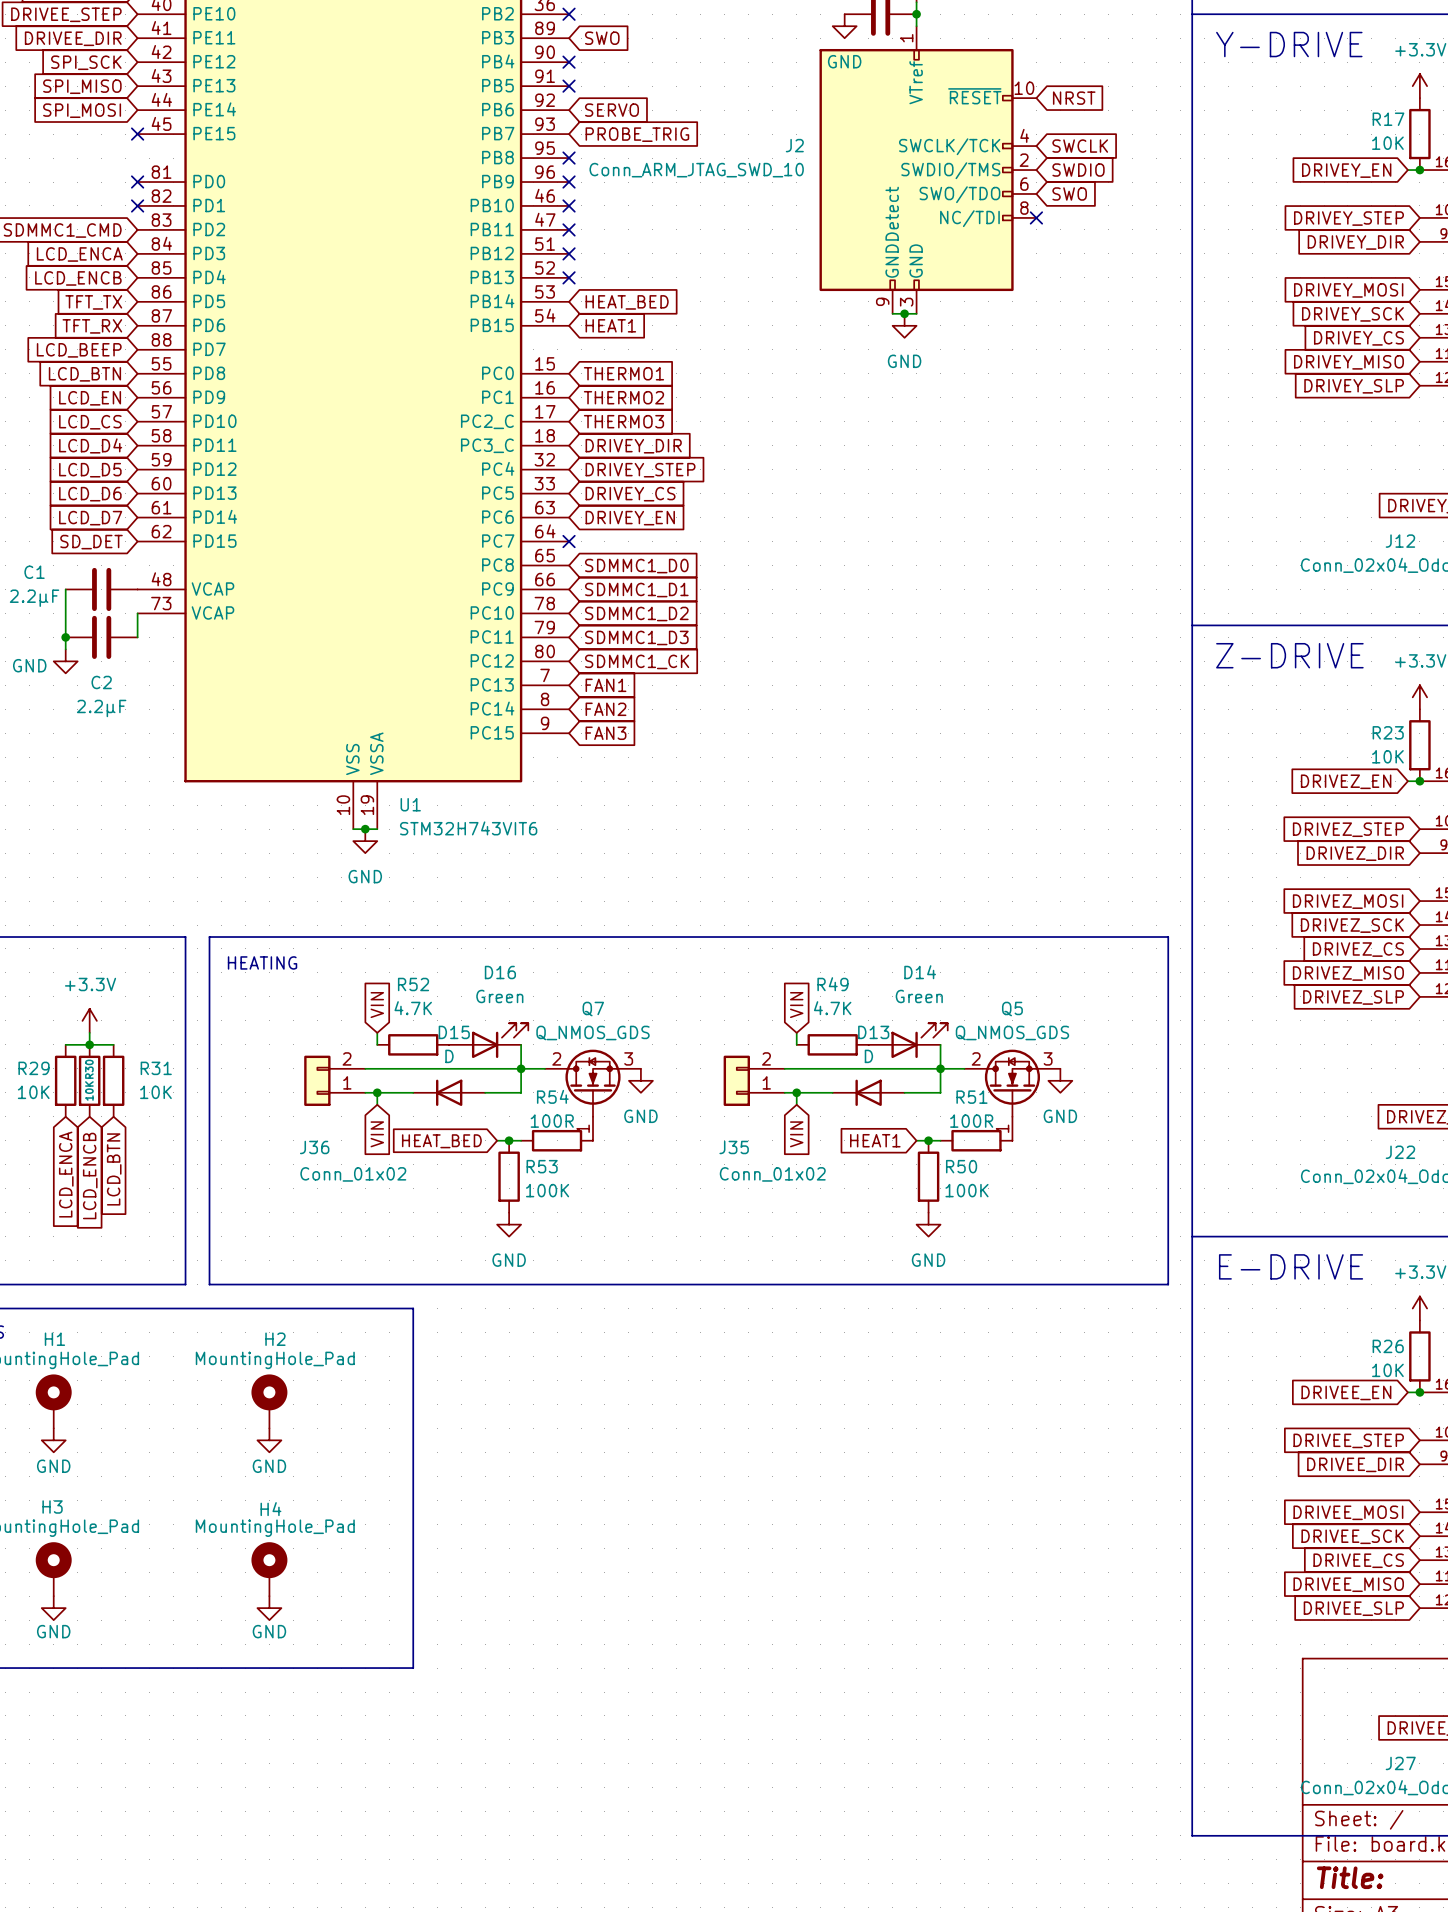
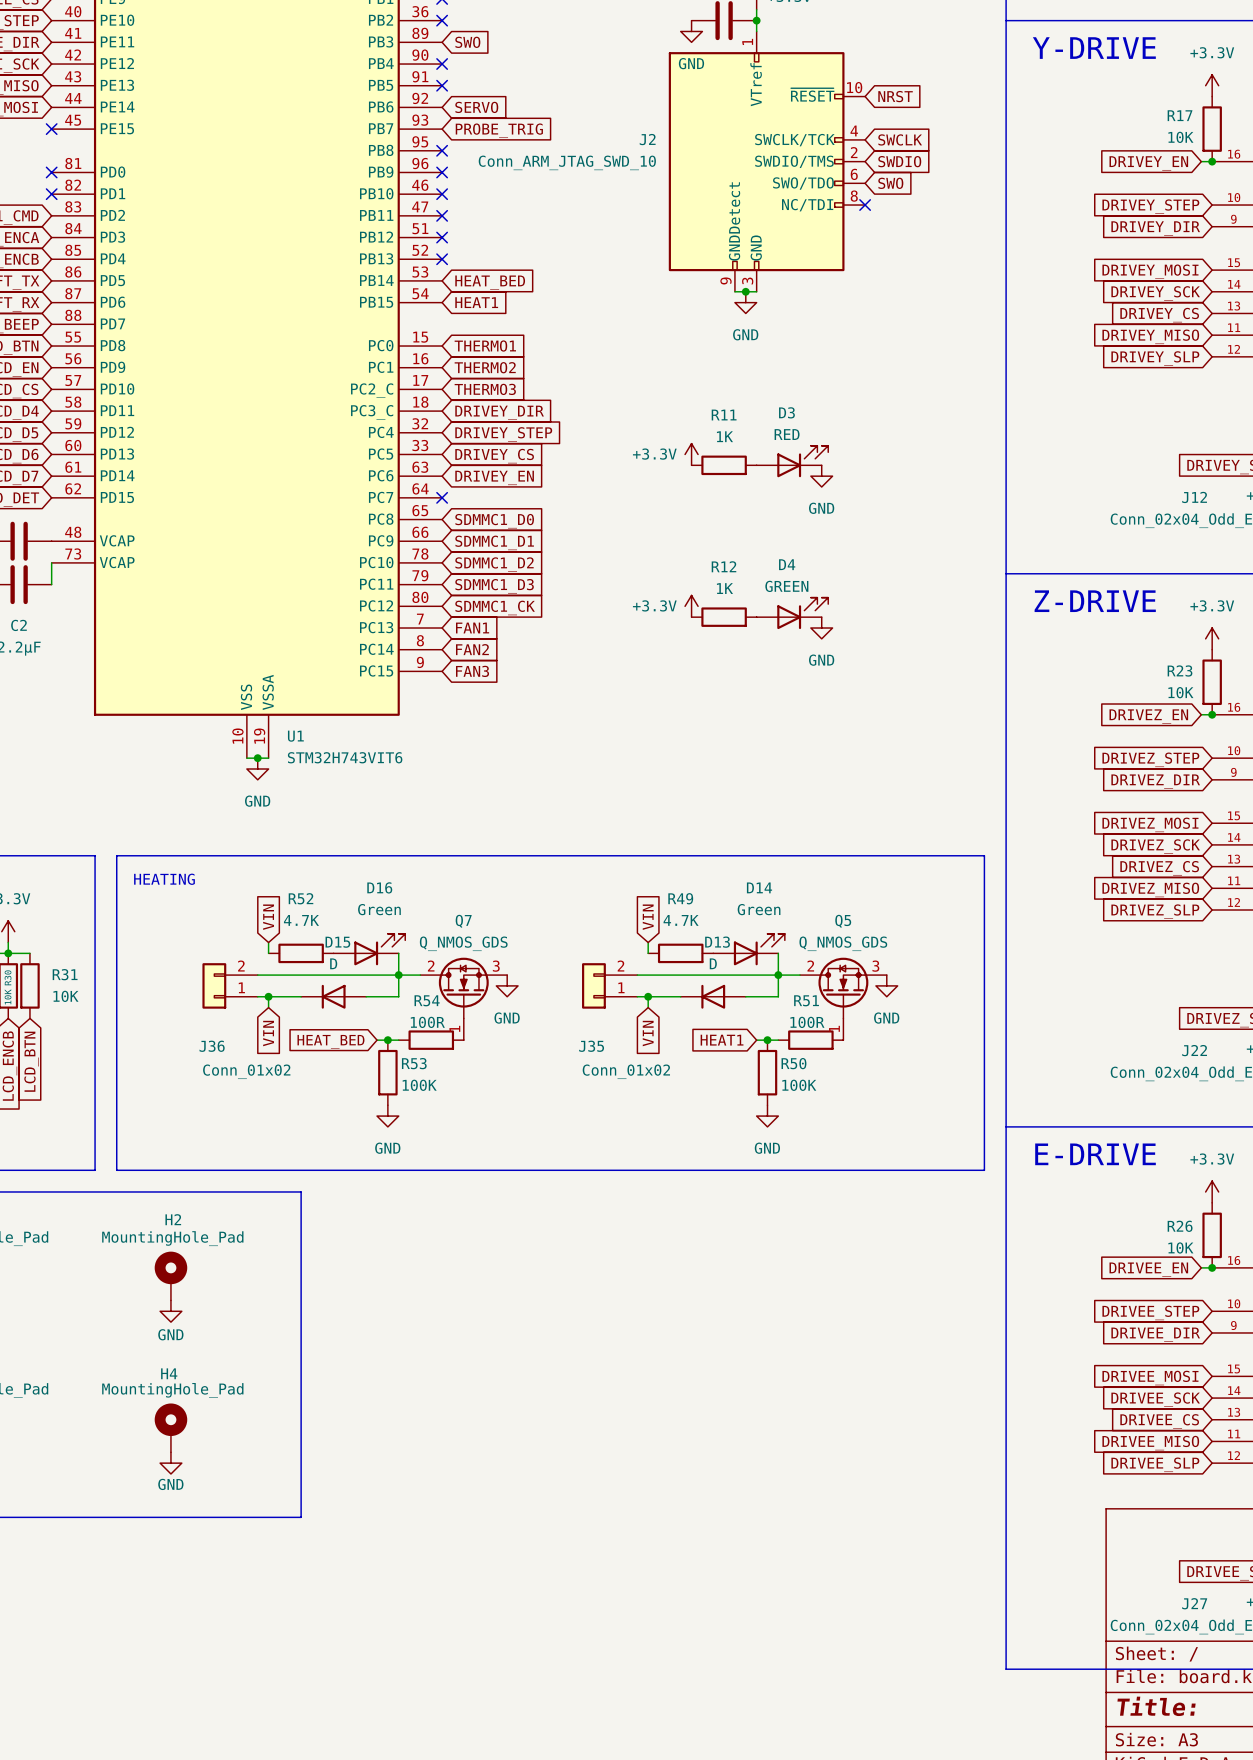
power symbol: none -> +3.3V (691, 454)
D3: none -> RED (792, 461)
R11: none -> 1K (724, 465)
power symbol: none -> GND (821, 476)
power symbol: none -> +3.3V (691, 606)
D4: none -> GREEN (792, 613)
R12: none -> 1K (724, 617)
power symbol: none -> GND (821, 628)

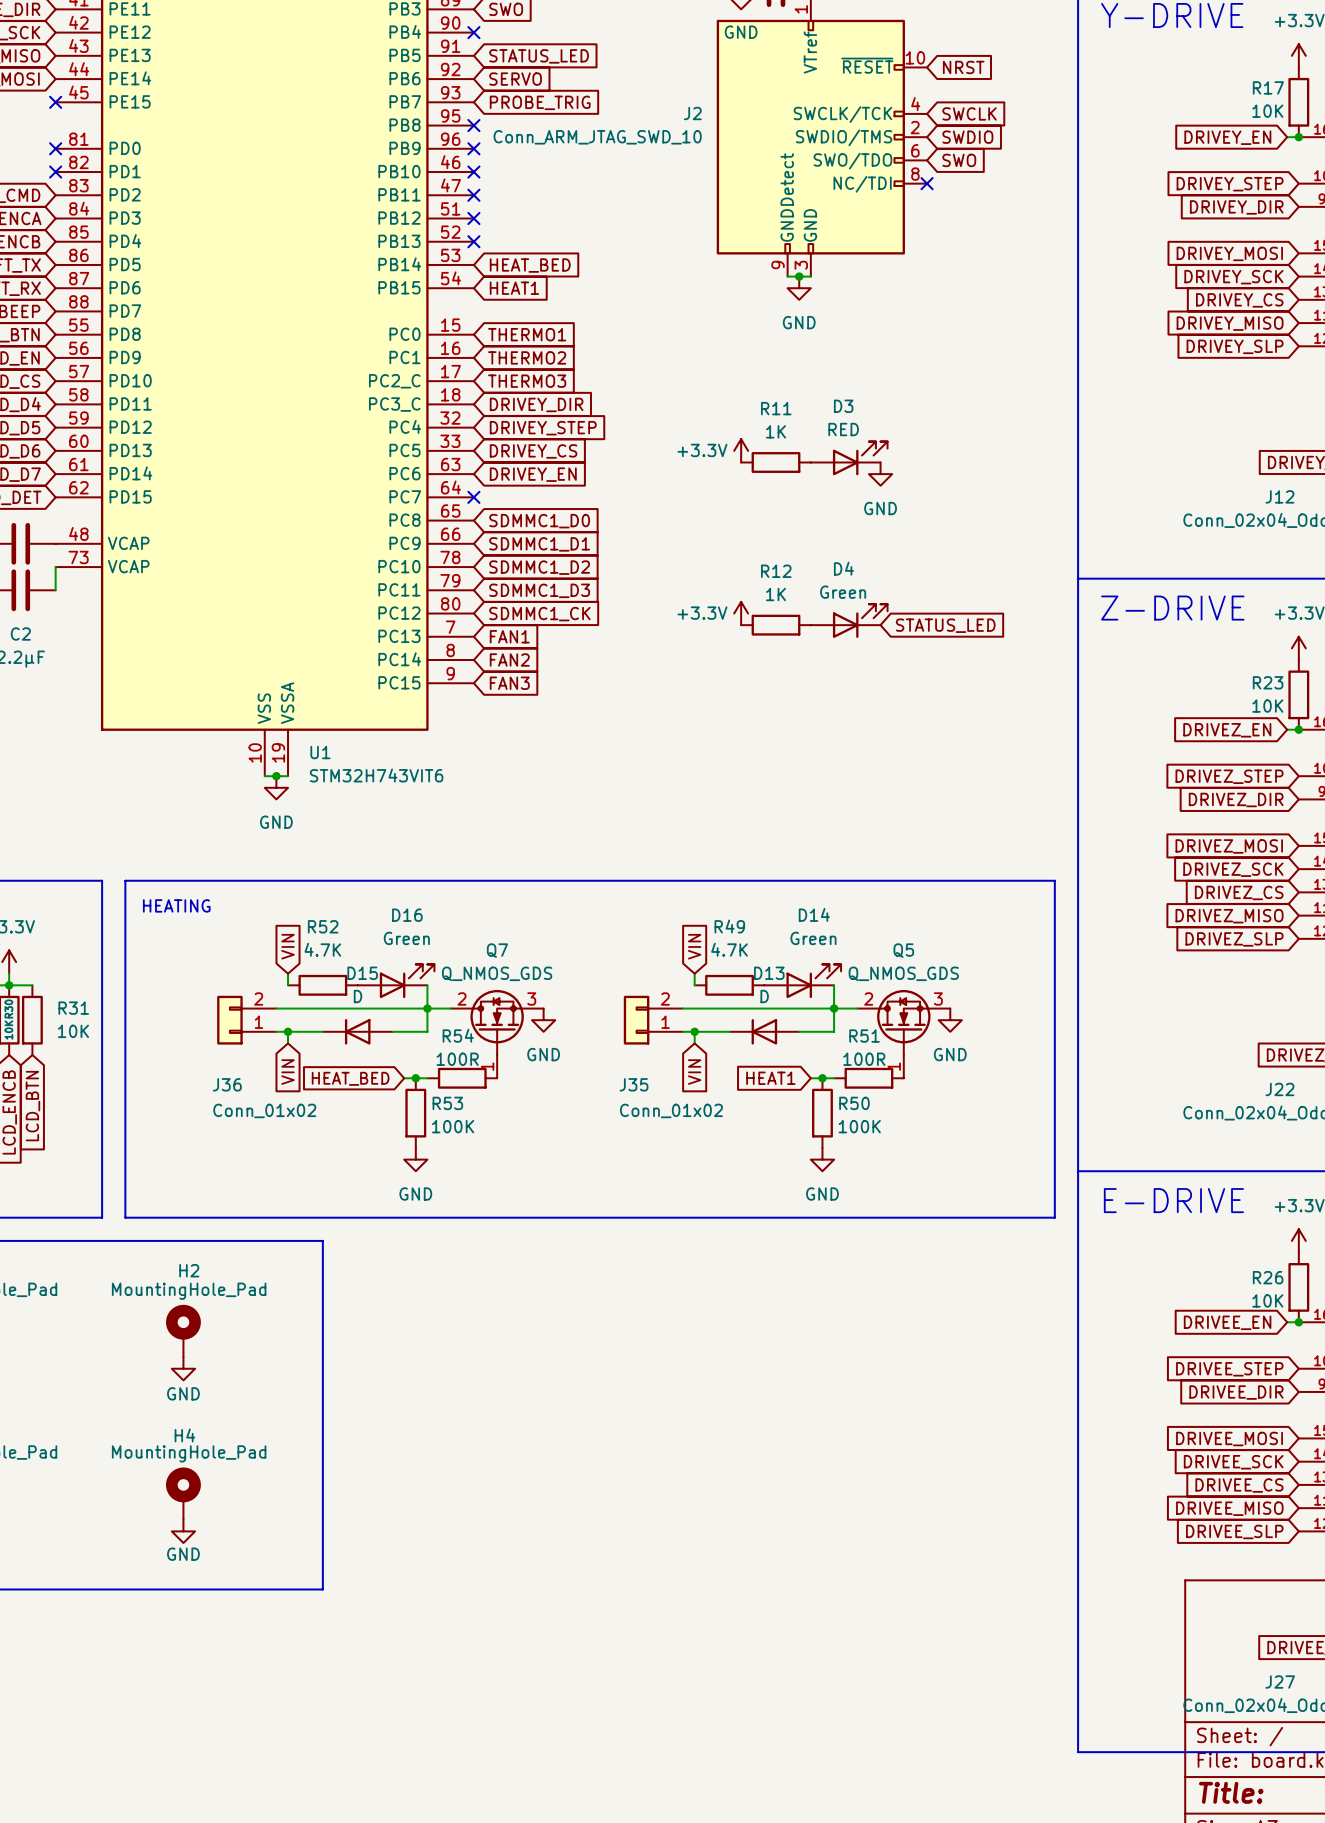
no-connect mark: (442, 85) -> none
global label: none -> STATUS_LED (539, 56)
D4 value: GREEN (786, 586) -> Green (843, 592)
global label: none -> STATUS_LED (945, 625)
power symbol: GND (821, 628) -> none

